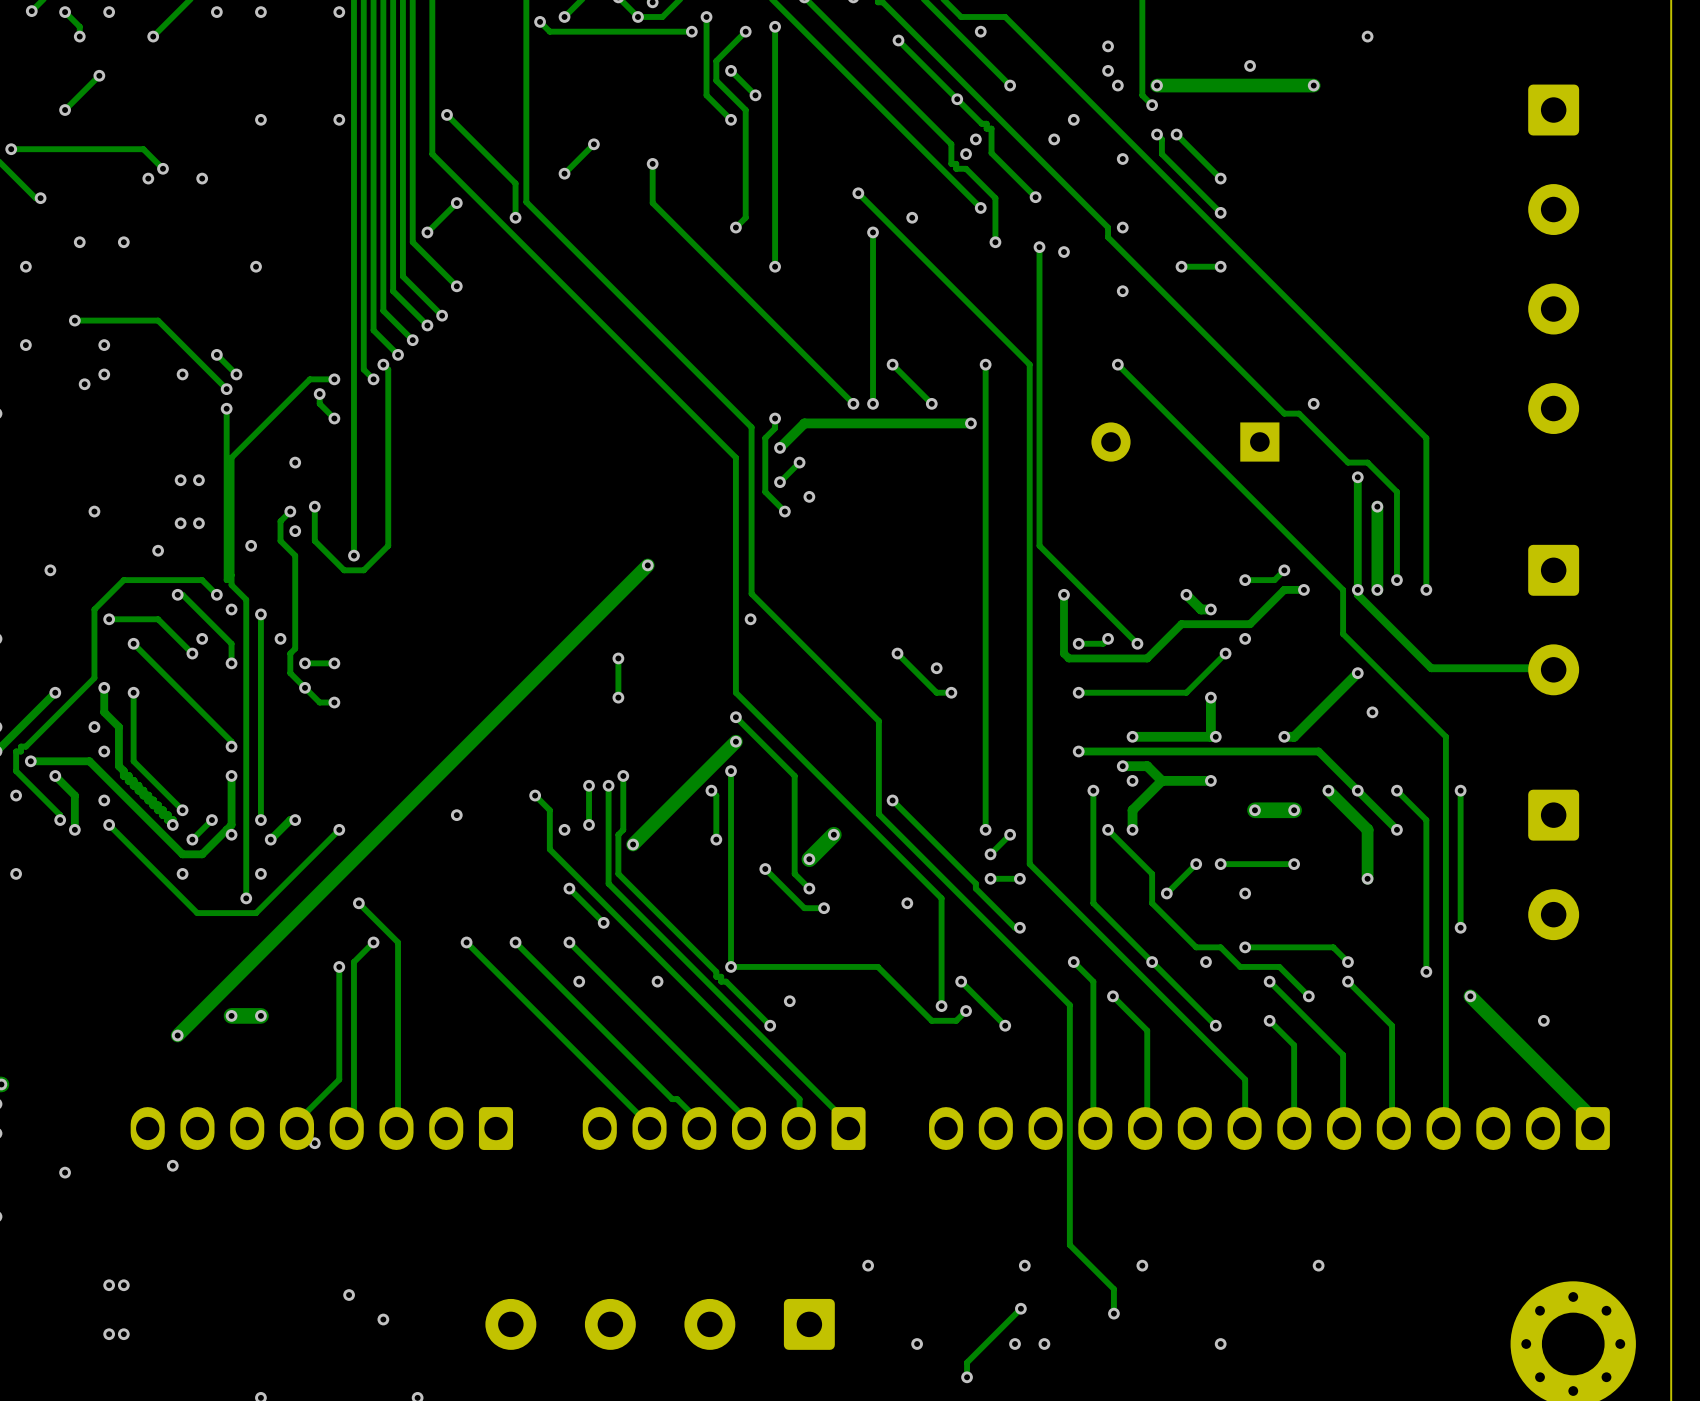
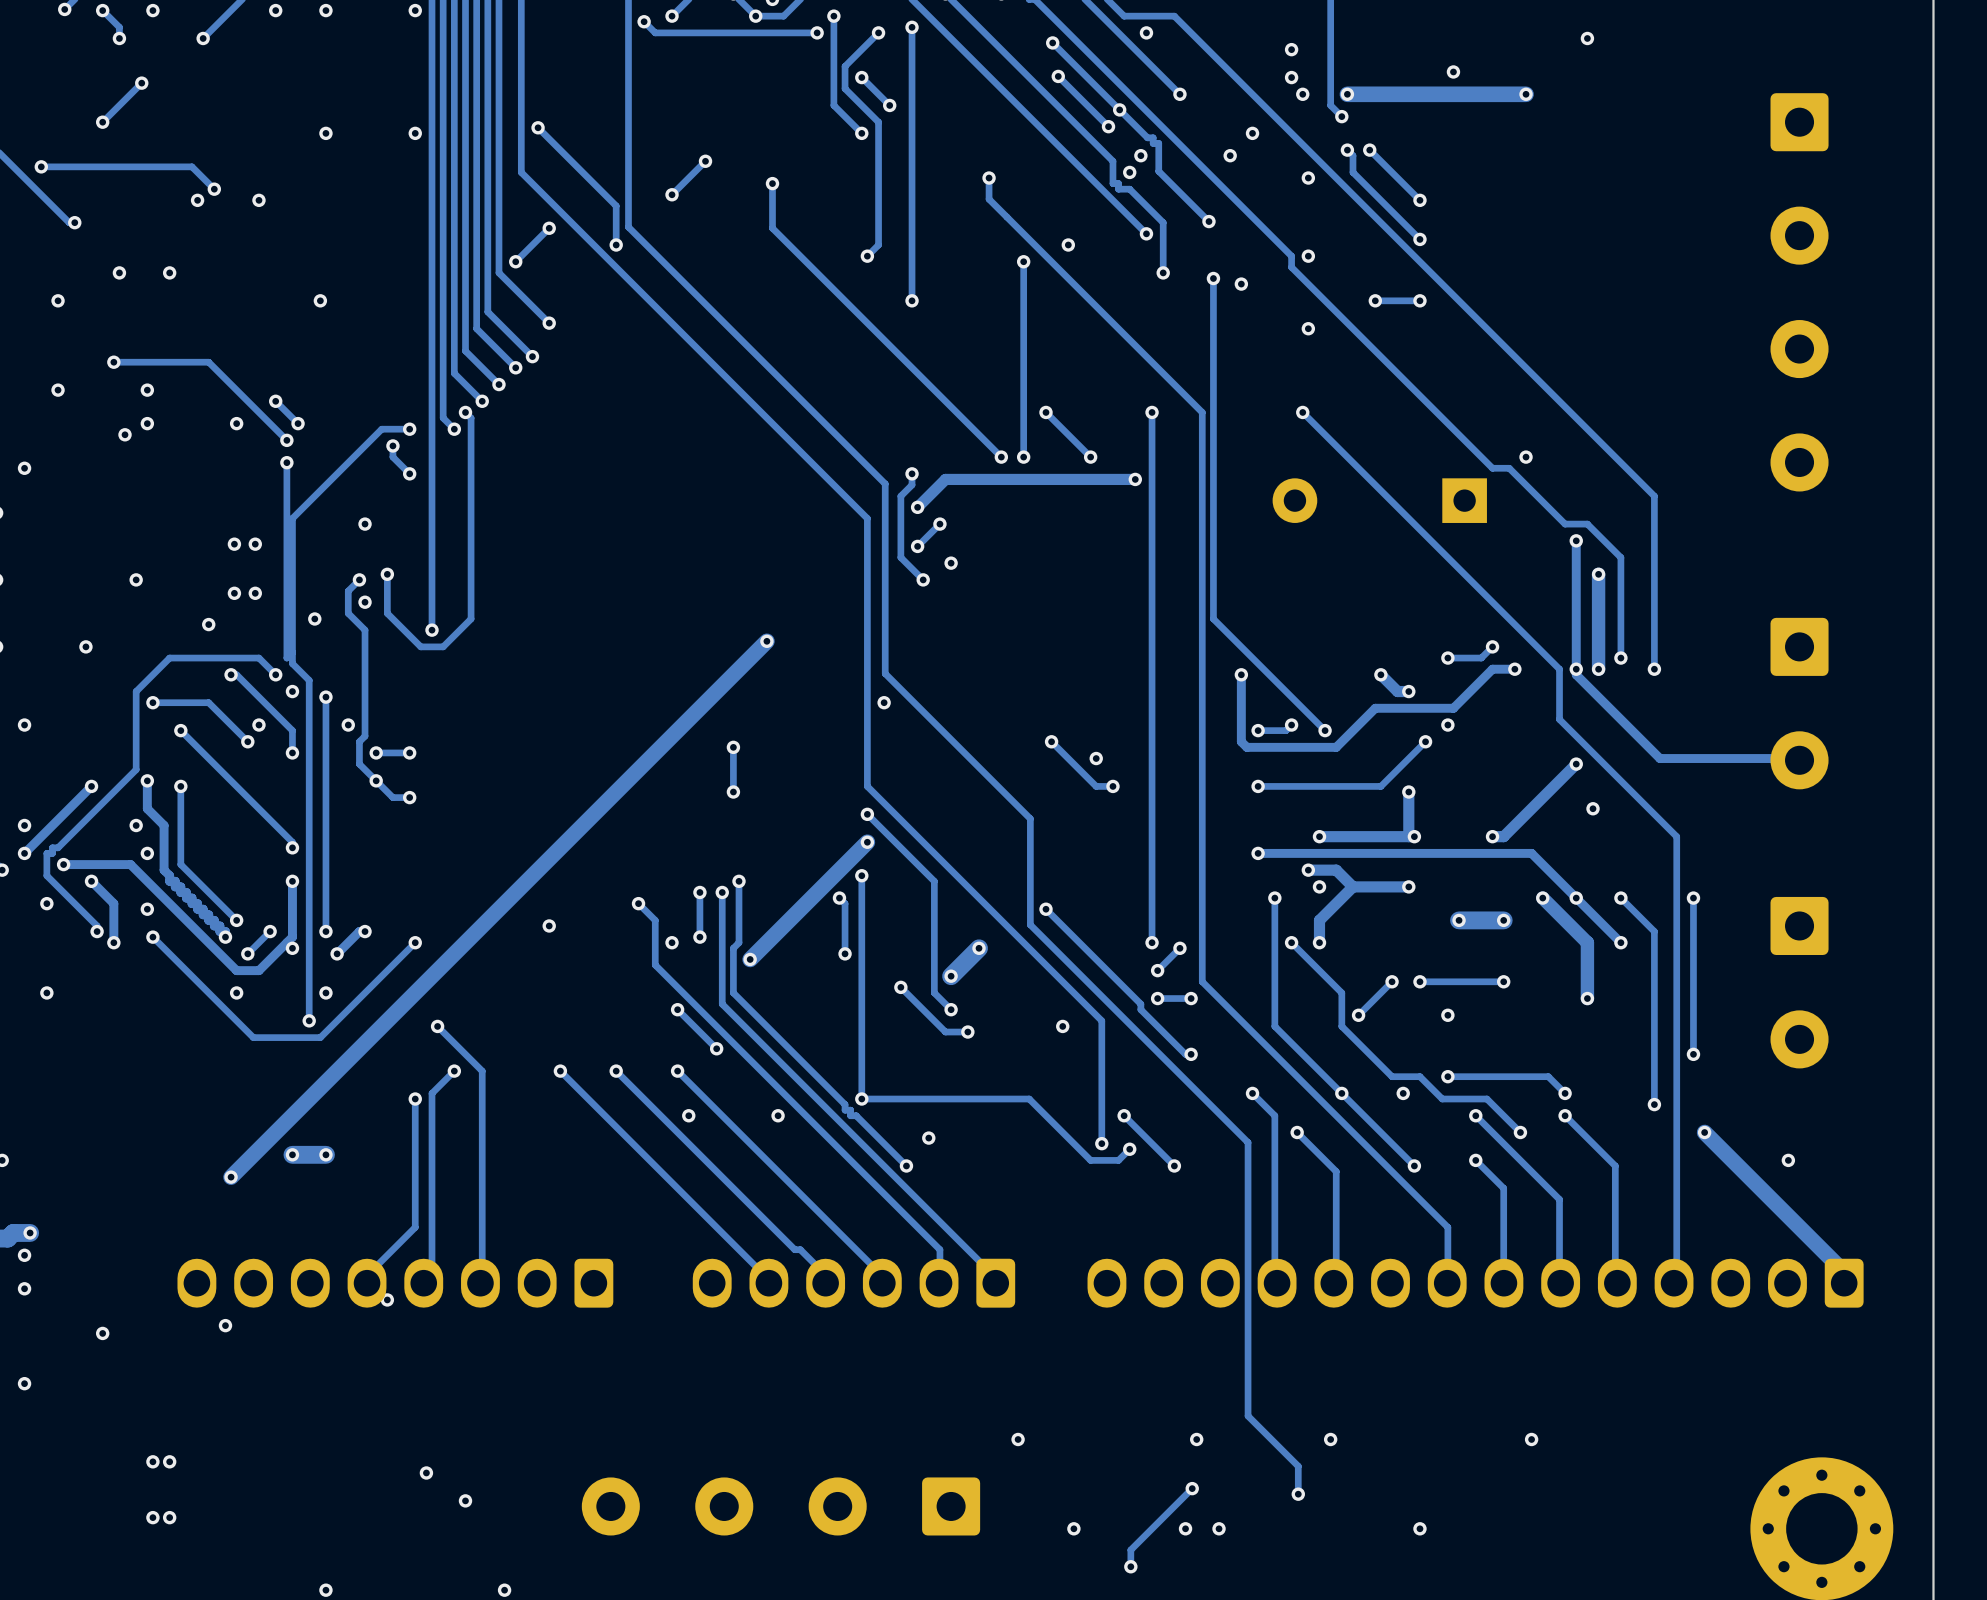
track: none -> (1058, 76) (1108, 126)
via: none -> (1058, 76)
via: none -> (1108, 126)
track: none -> (989, 178) (989, 199) (1006, 217)
via position: (858, 193) -> (989, 178)

